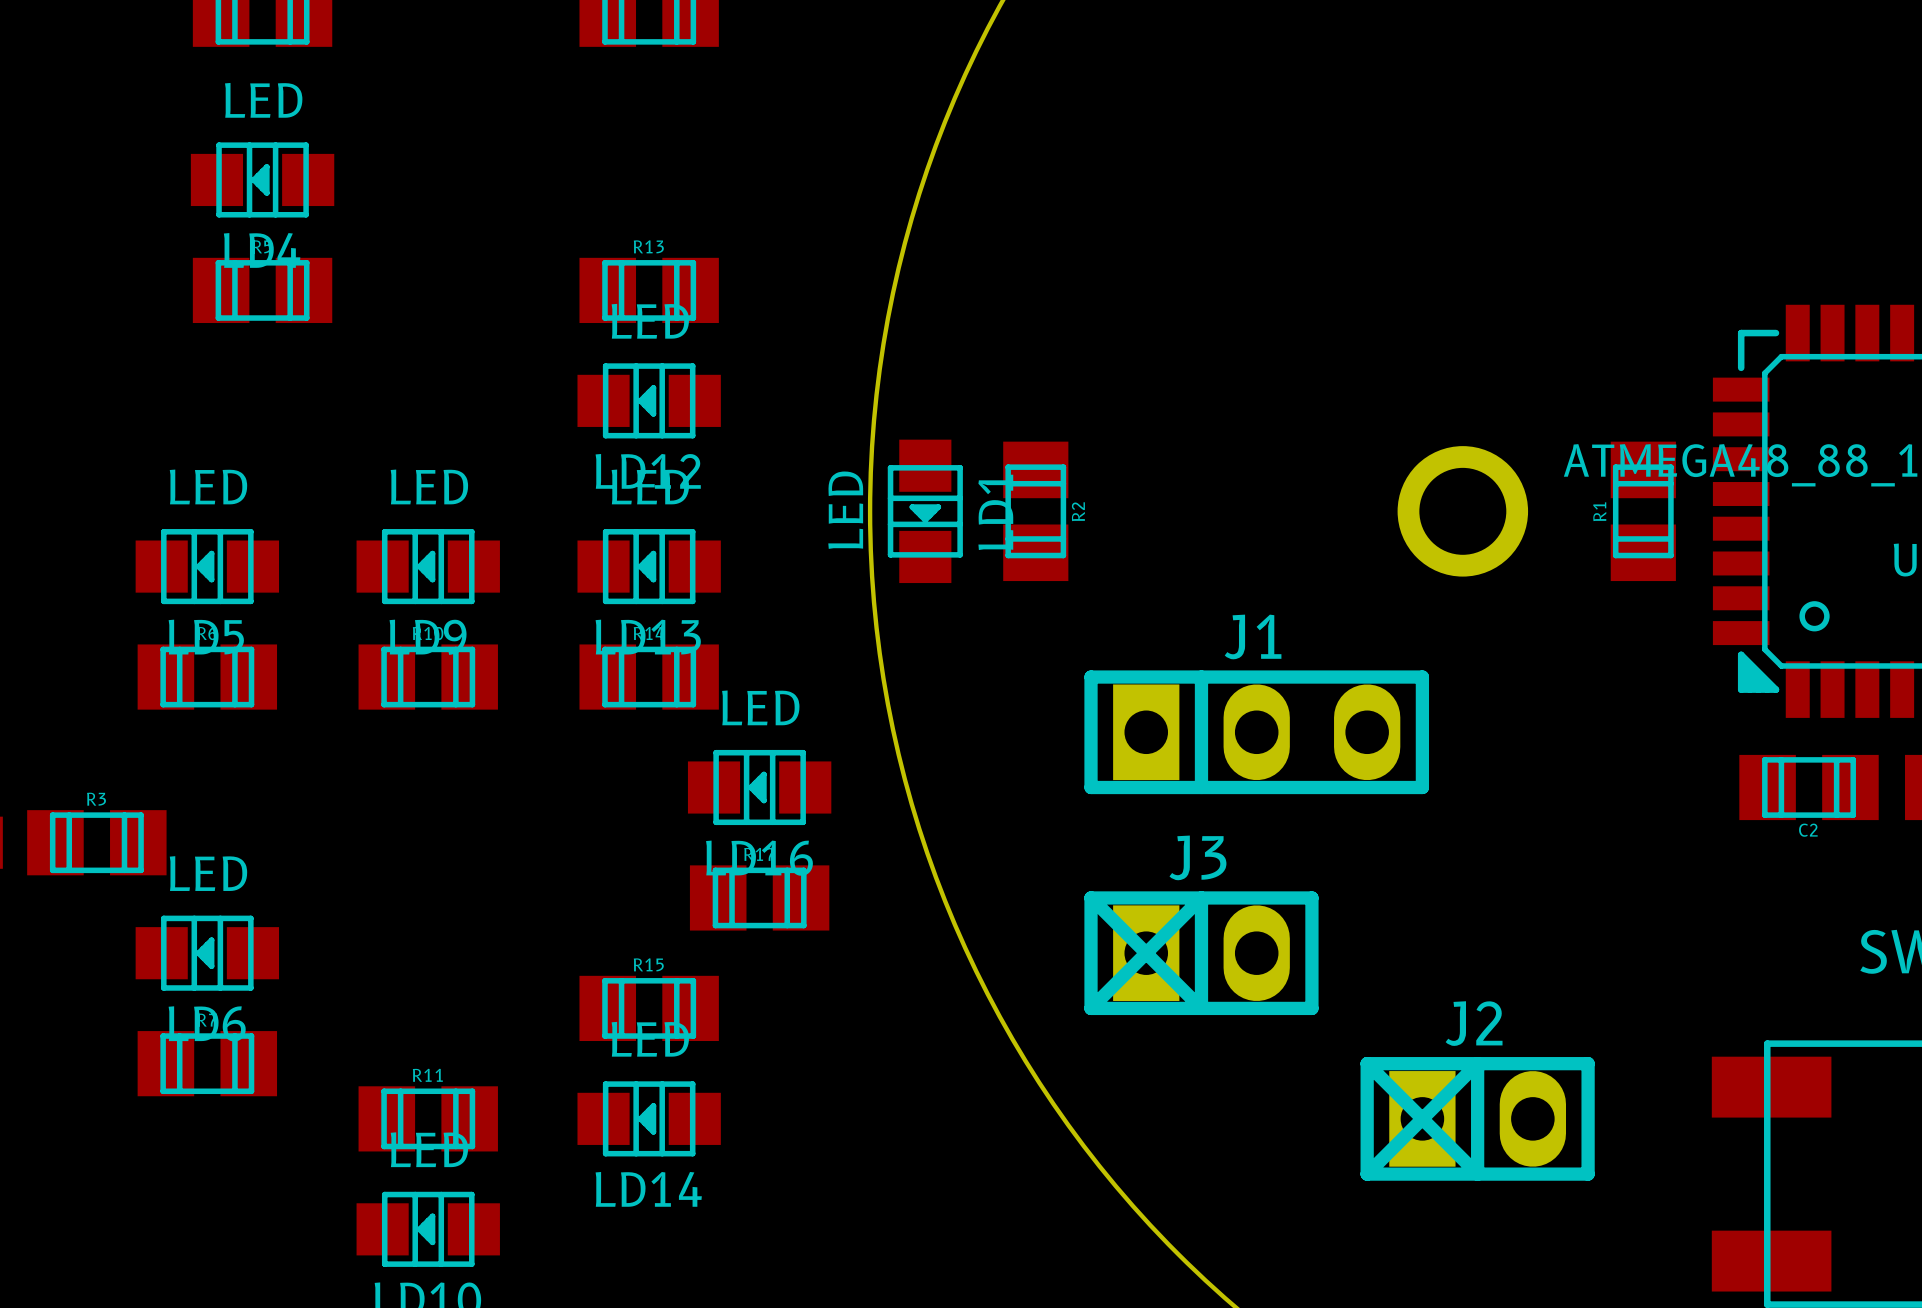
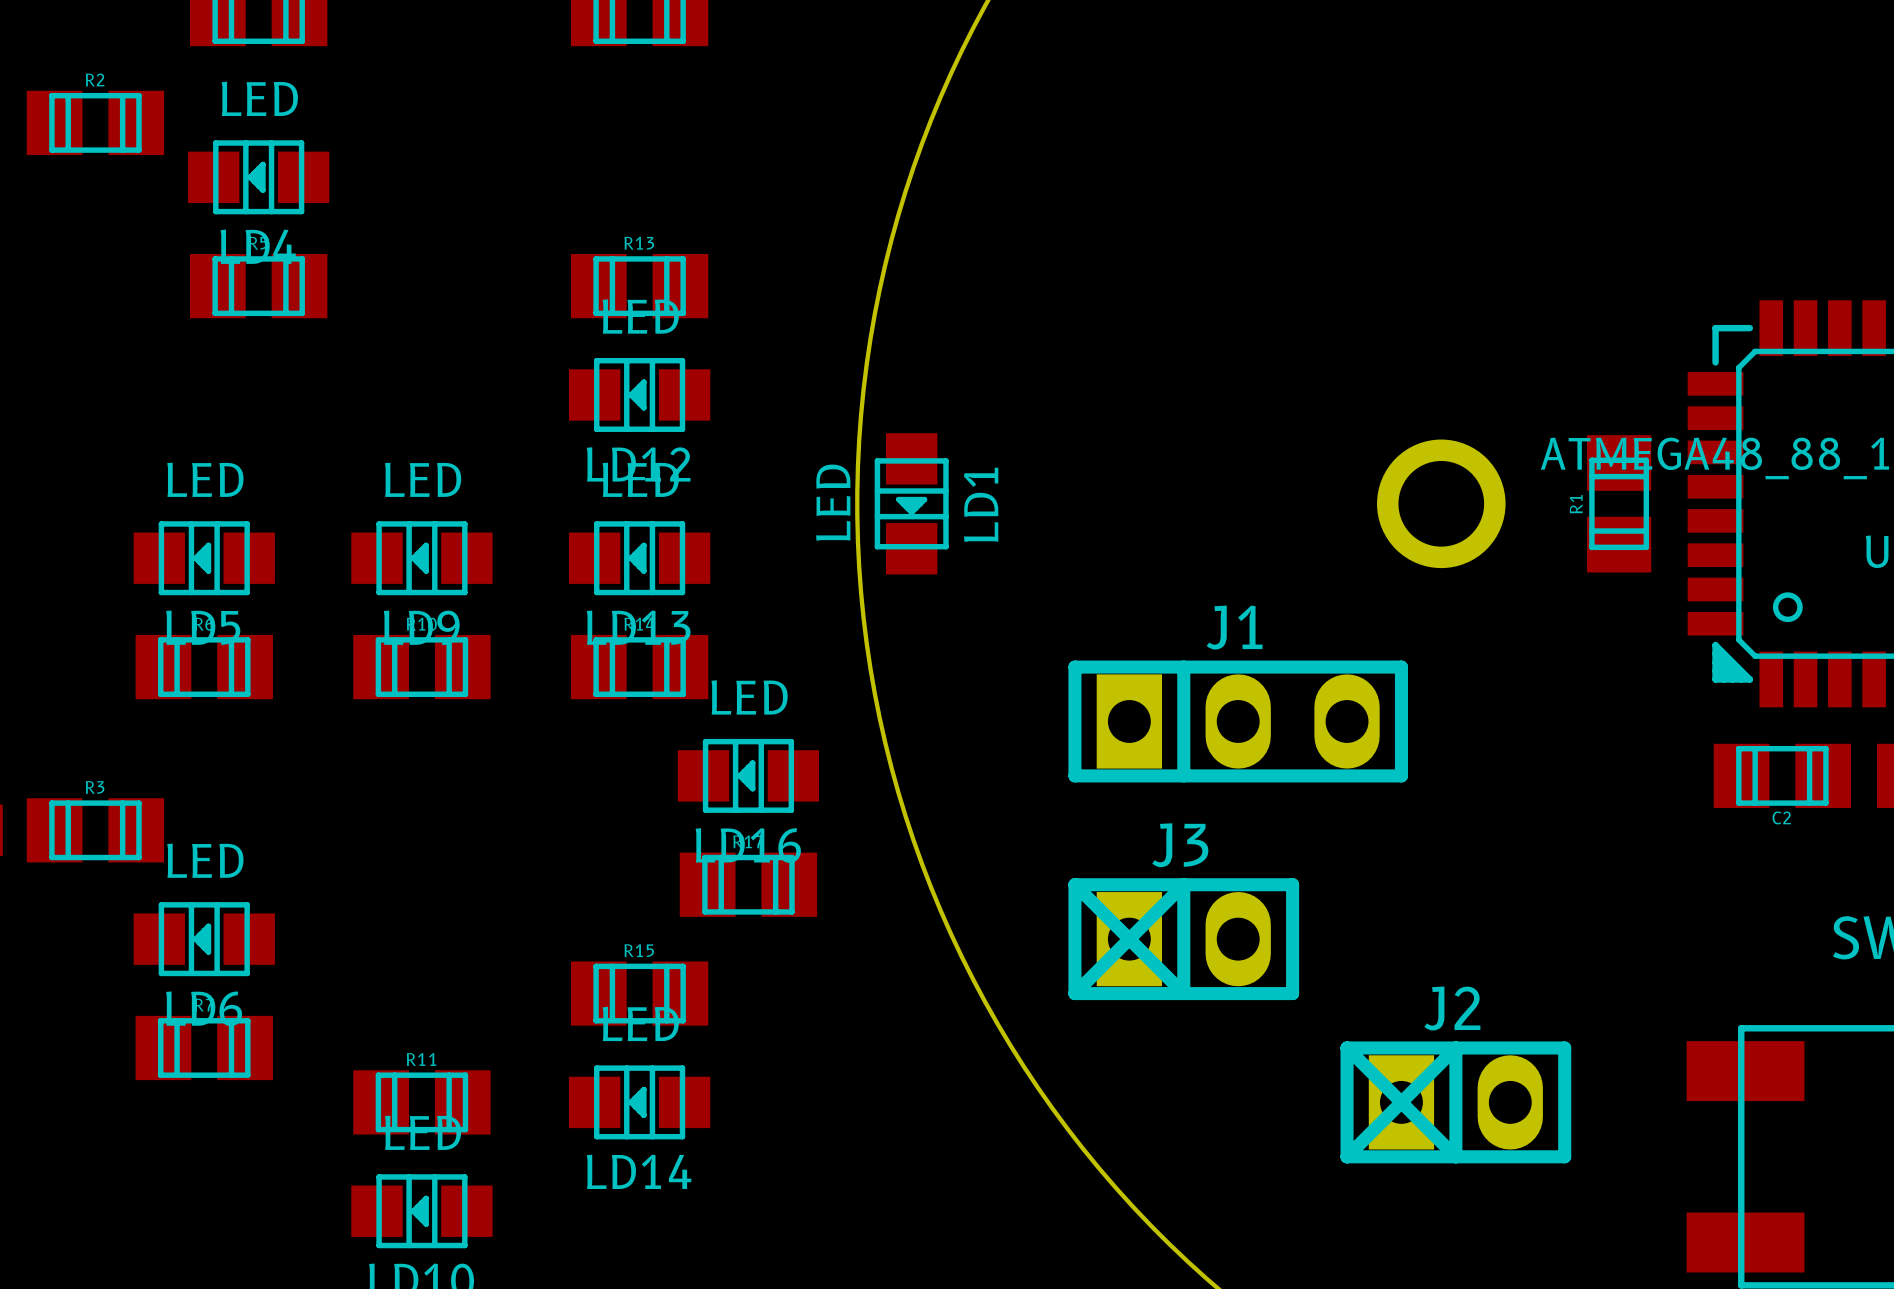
R2 rotation: 0° (1035, 511) -> 90° counterclockwise (95, 122)
R2 position: (1035, 511) -> (95, 122)

